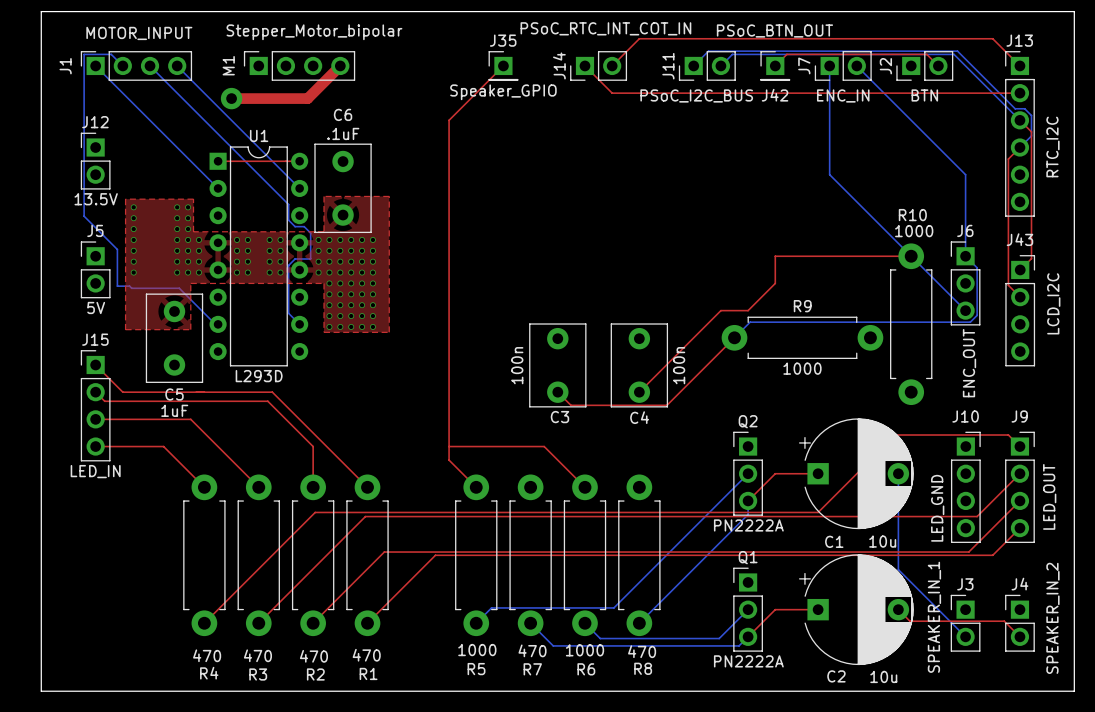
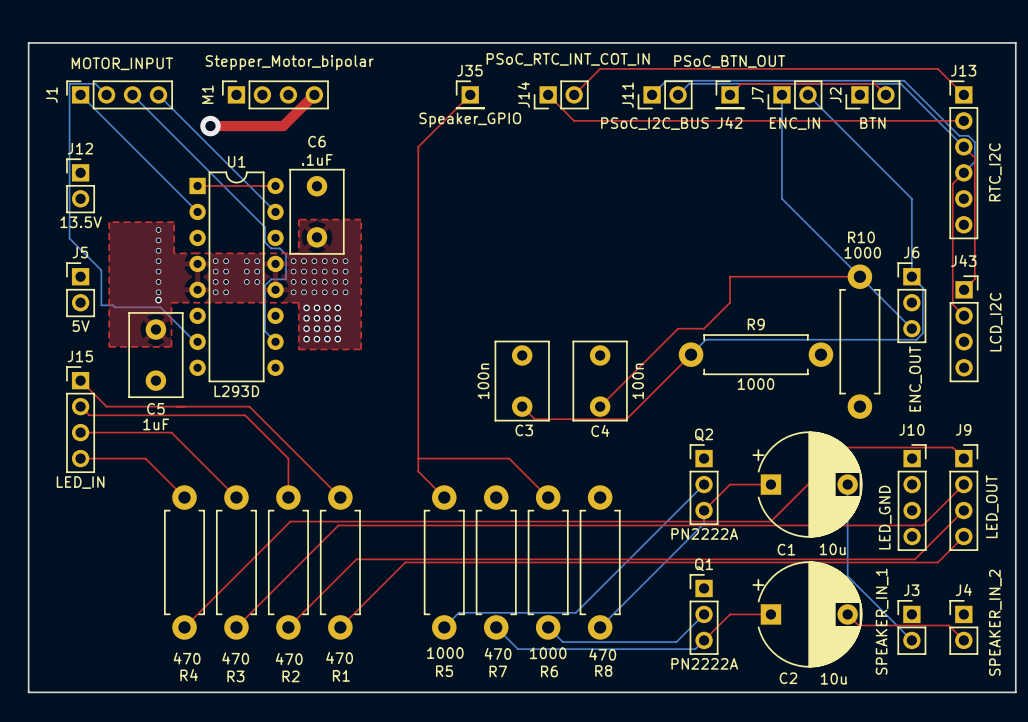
via: (133, 207) -> none
via: (188, 207) -> none
via: (133, 218) -> none
via: (188, 218) -> none
via: (133, 229) -> none
via: (188, 229) -> none
via: (133, 239) -> none
via: (188, 239) -> none
via: (198, 239) -> none
via: (133, 250) -> none
via: (188, 250) -> none
via: (198, 250) -> none
via: (133, 261) -> none
via: (188, 261) -> none
via: (198, 261) -> none
via: (133, 272) -> none
via: (188, 272) -> none
via: (198, 272) -> none
via: (269, 272) -> none
via: (280, 272) -> none
via: none -> (158, 300)
via: (329, 283) -> none
via: (340, 283) -> none
via: (351, 283) -> none
via: (362, 283) -> none
via: (372, 283) -> none
via: none -> (306, 307)
via: none -> (316, 307)
via: none -> (327, 307)
via: none -> (337, 307)
via: (329, 294) -> none
via: (340, 294) -> none
via: (351, 294) -> none
via: (362, 294) -> none
via: (372, 294) -> none
via: none -> (306, 318)
via: none -> (316, 318)
via: none -> (327, 318)
via: none -> (337, 318)
via: (329, 305) -> none
via: (340, 305) -> none
via: (351, 305) -> none
via: (362, 305) -> none
via: (372, 305) -> none
via: none -> (306, 328)
via: none -> (316, 328)
via: none -> (327, 328)
via: none -> (337, 328)
via: (329, 316) -> none
via: (340, 316) -> none
via: (351, 316) -> none
via: (362, 316) -> none
via: (372, 316) -> none
via: none -> (306, 339)
via: none -> (316, 339)
via: none -> (327, 339)
via: none -> (337, 339)
via: (329, 326) -> none
via: (340, 326) -> none
via: (351, 326) -> none
via: (362, 326) -> none
via: (372, 326) -> none

